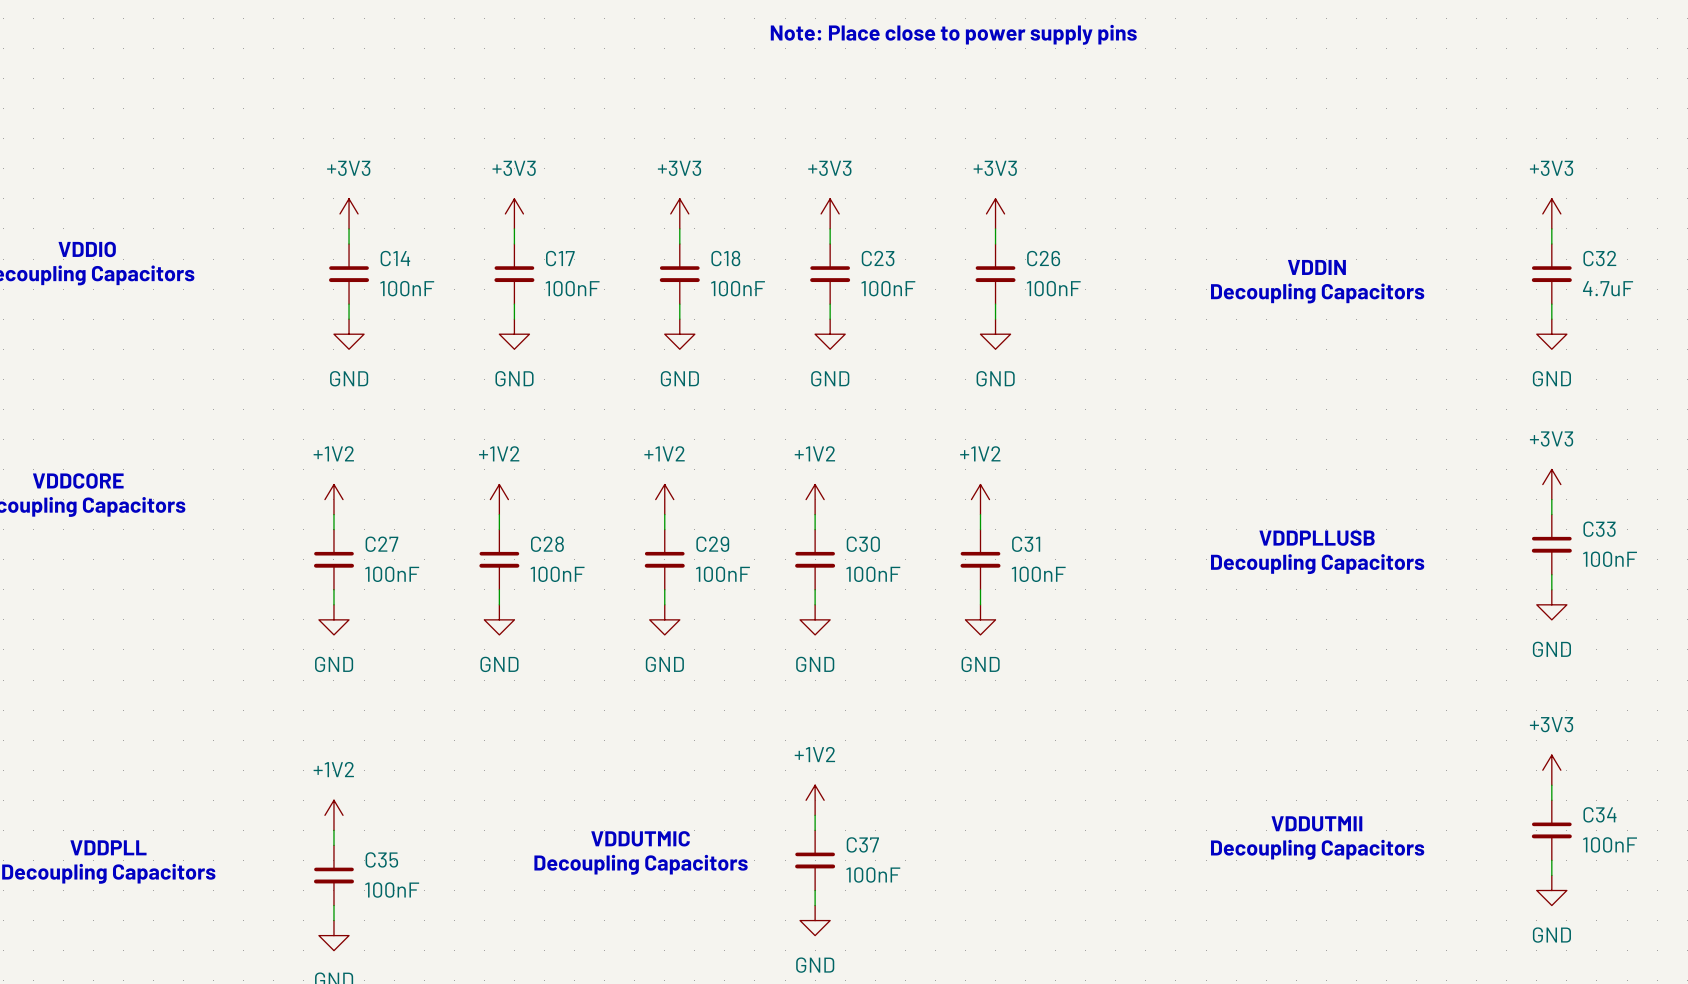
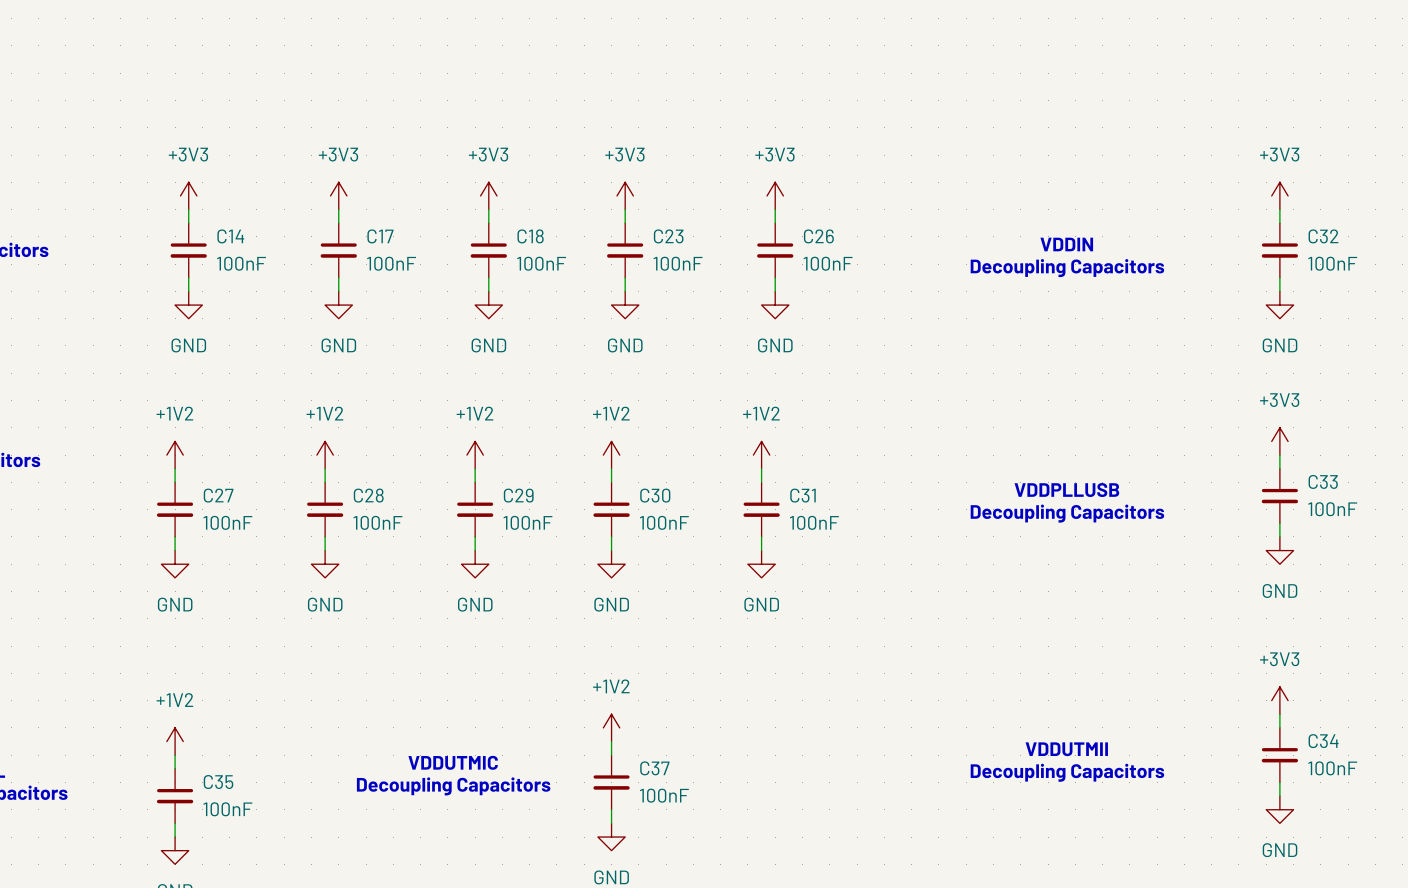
text: Note: Place close to power supply pins (953, 34) -> none
C32 value: 4.7uF (1608, 288) -> 100nF (1332, 263)

